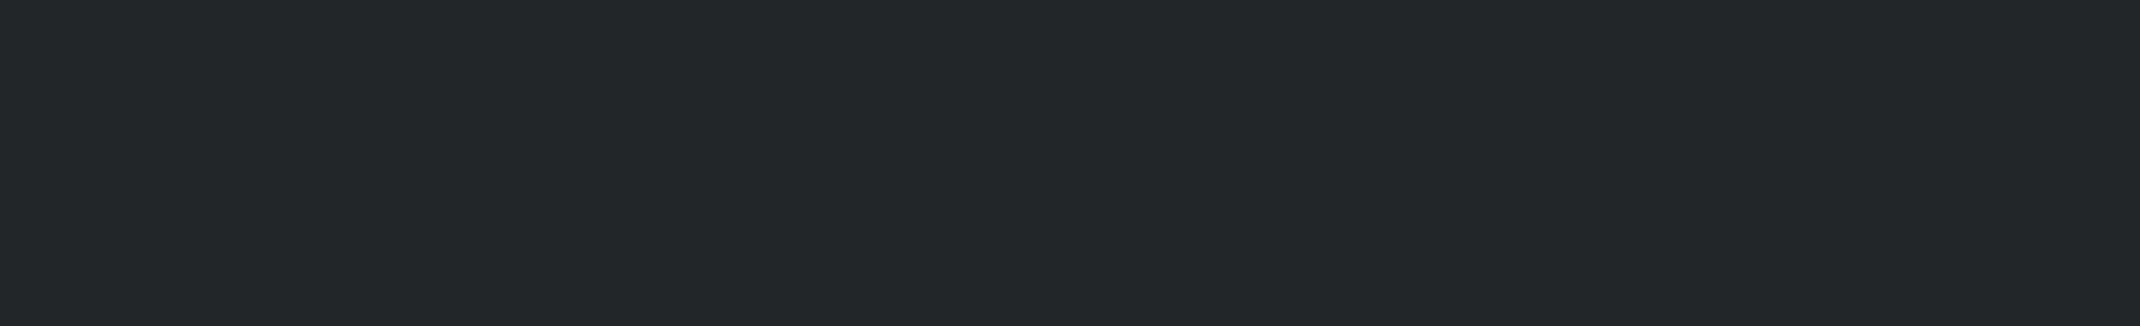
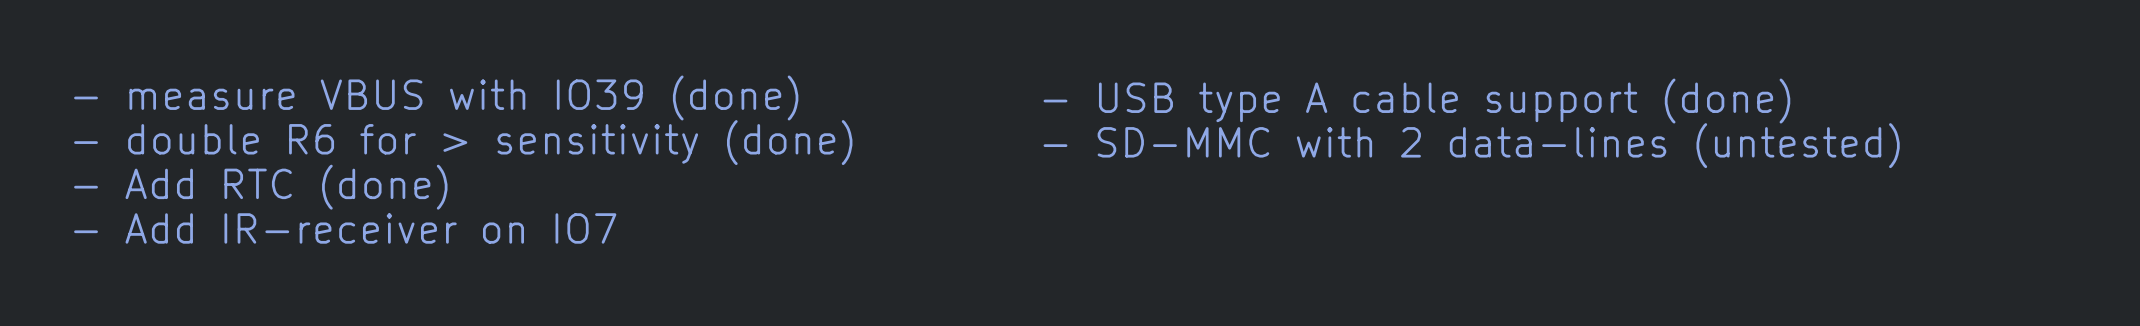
text: none -> - measure VBUS with IO39 (done) (436, 97)
text: none -> - USB type A cable support (done) (1416, 101)
text: none -> - double R6 for > sensitivity (done) (463, 142)
text: none -> - SD-MMC with 2 data-lines (untested) (1471, 145)
text: none -> - Add RTC (done) (260, 187)
text: none -> - Add IR-receiver on IO7 (345, 228)

